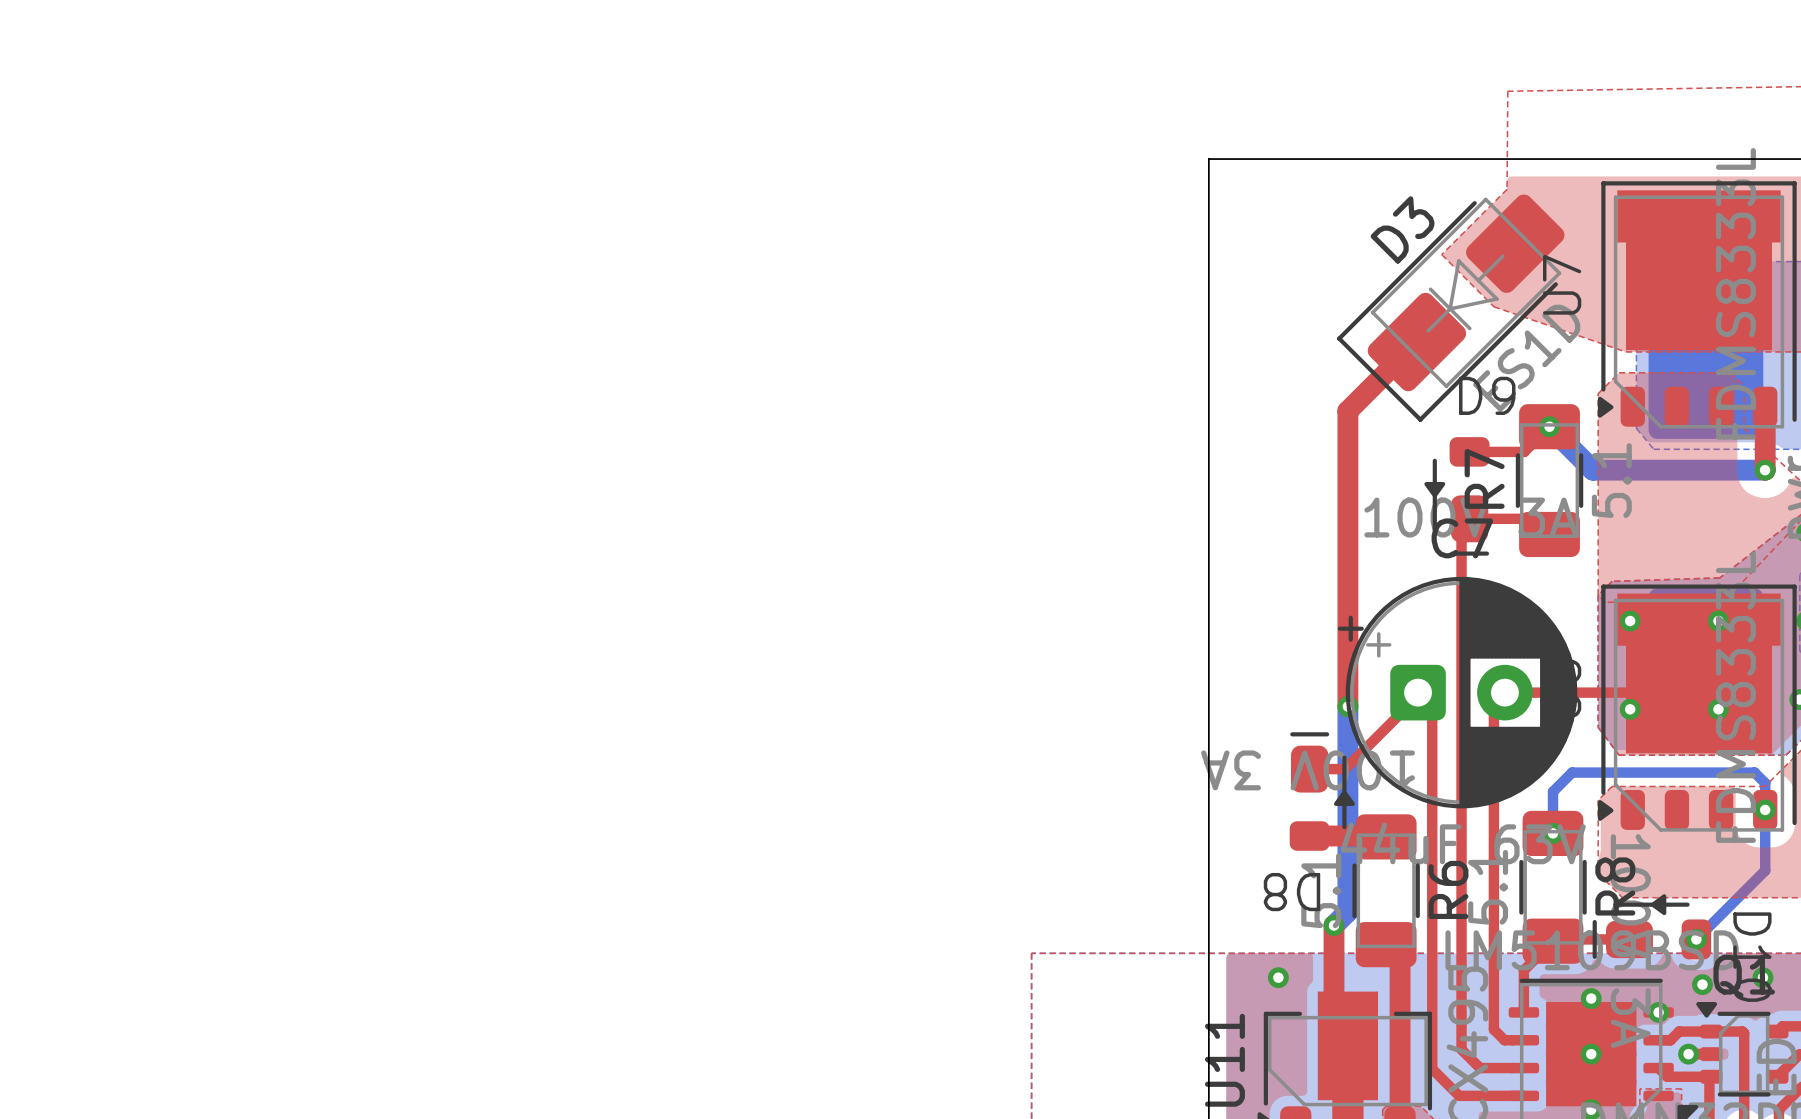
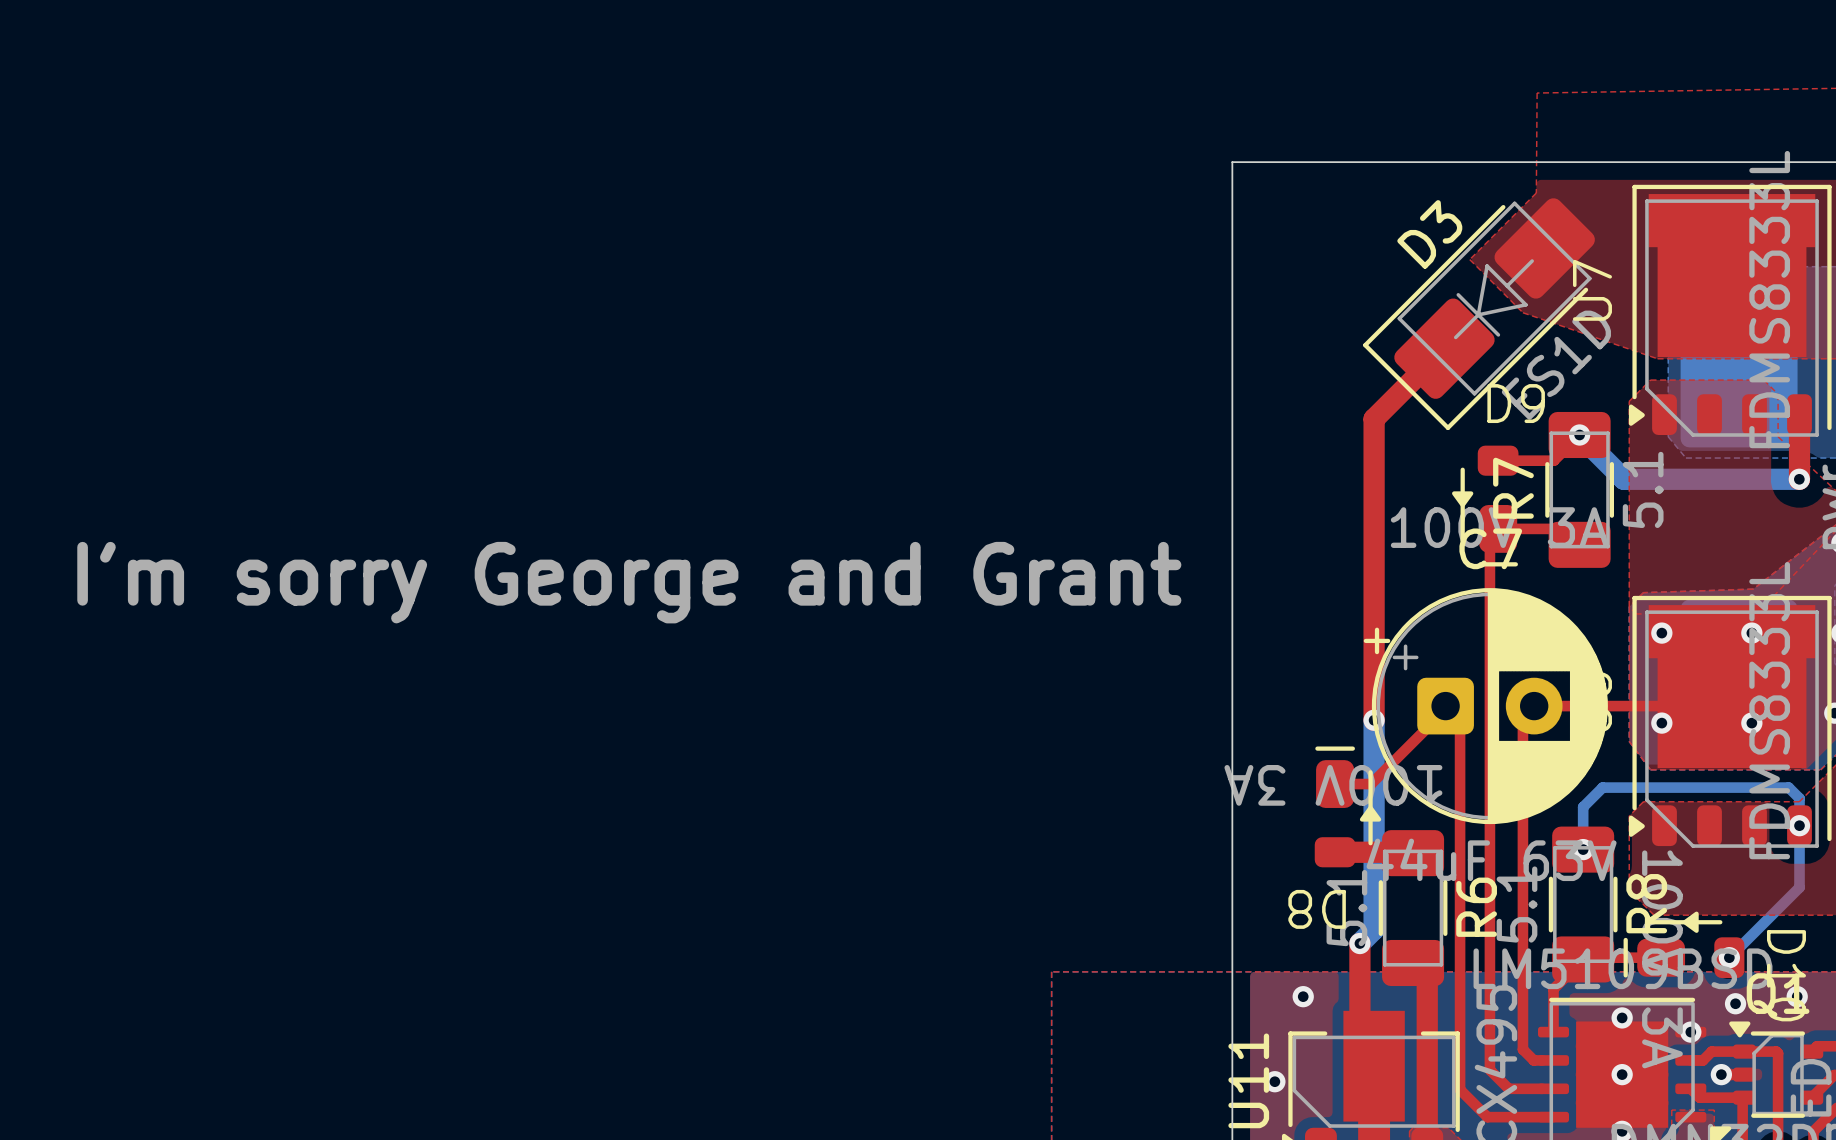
text: none -> I'm sorry George and Grant (629, 582)
via: none -> (1274, 1081)

